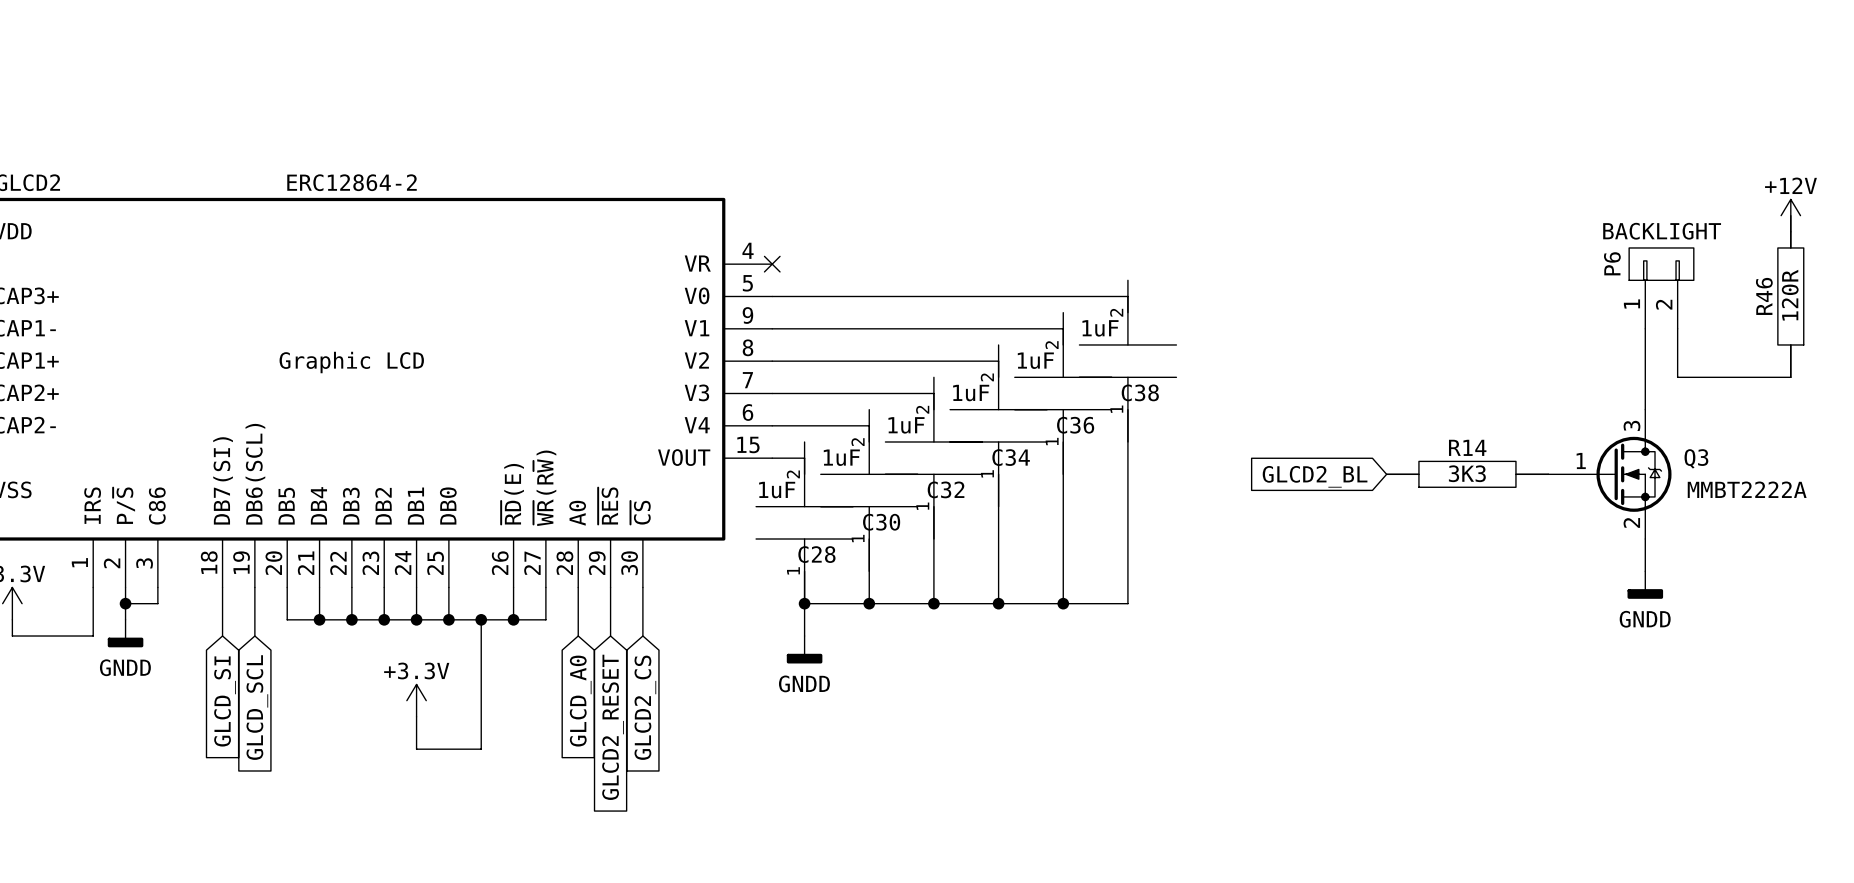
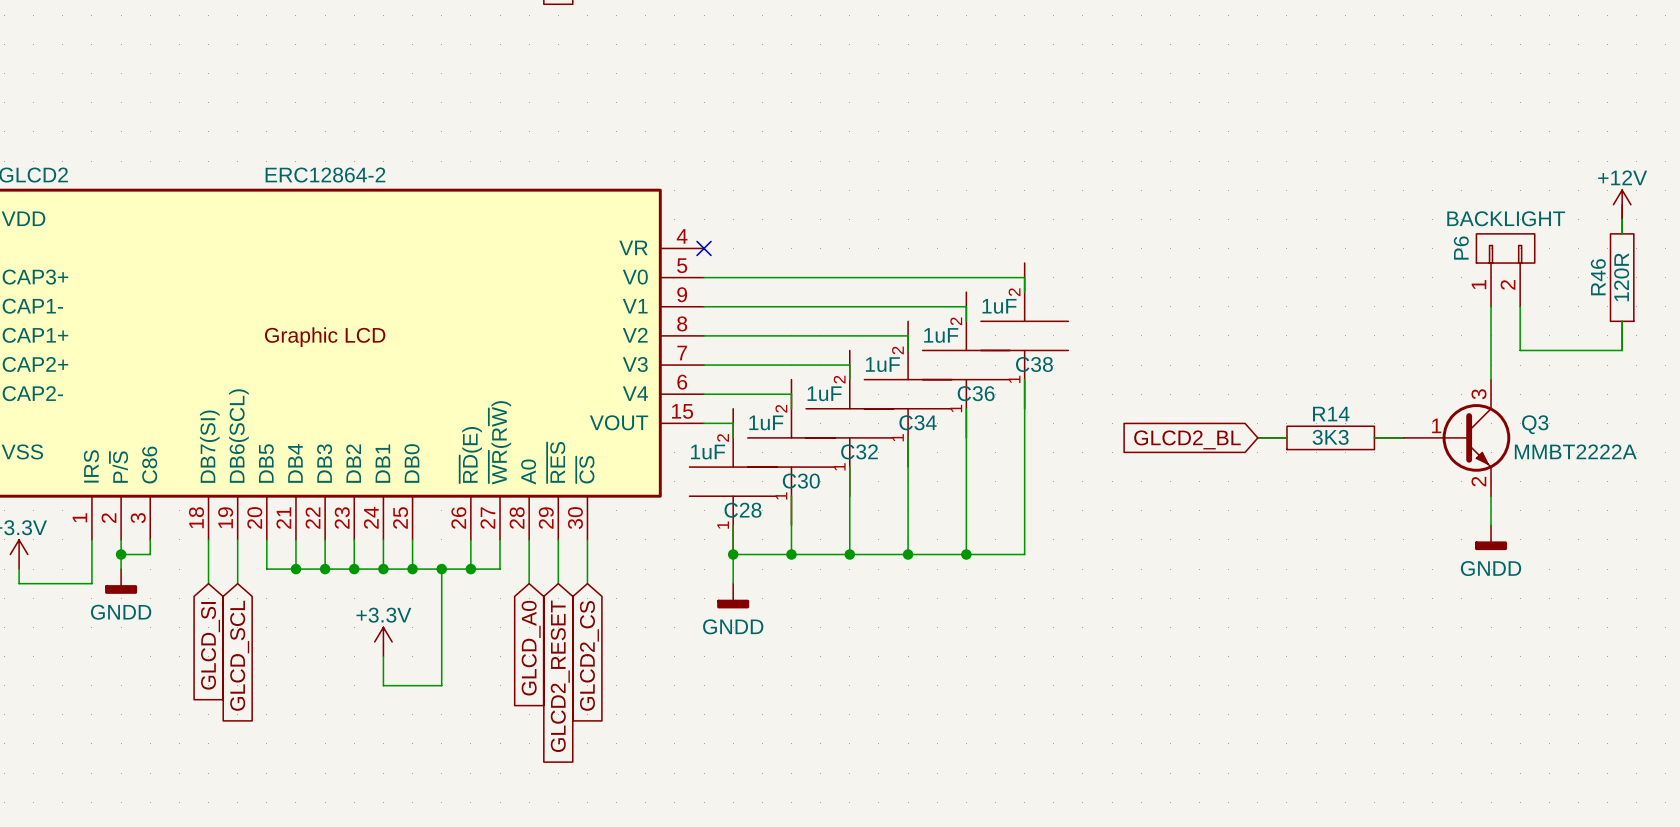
Q3 symbol: [1548, 409, 1672, 540] -> [1403, 379, 1511, 497]

